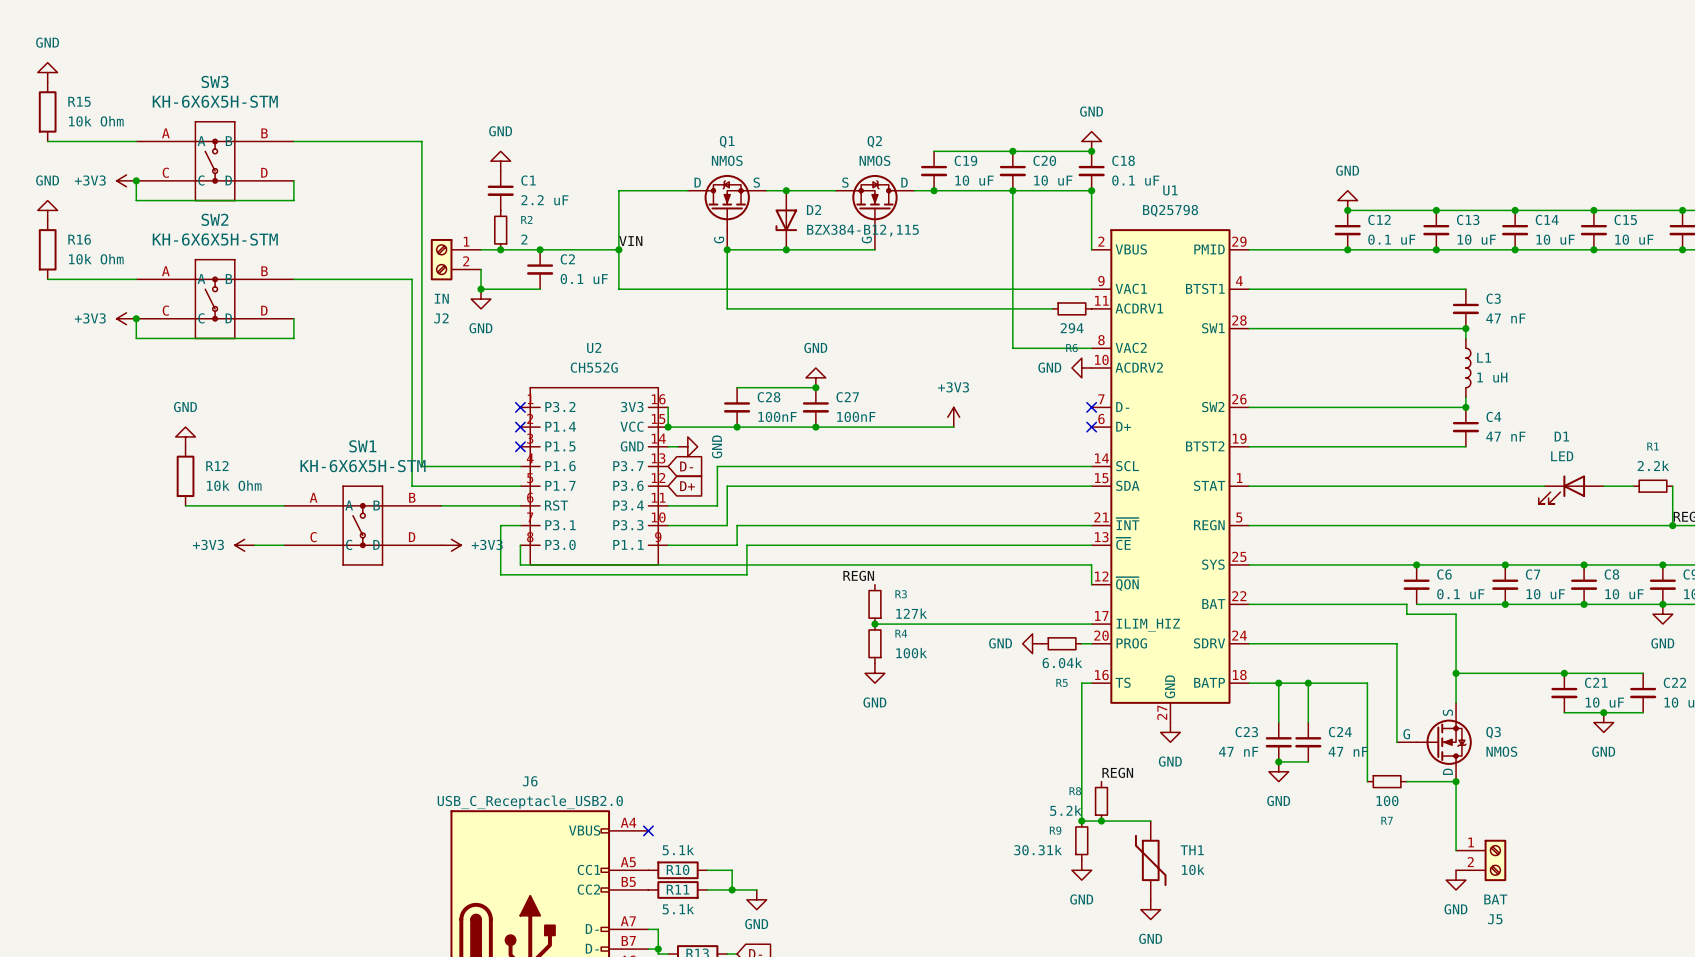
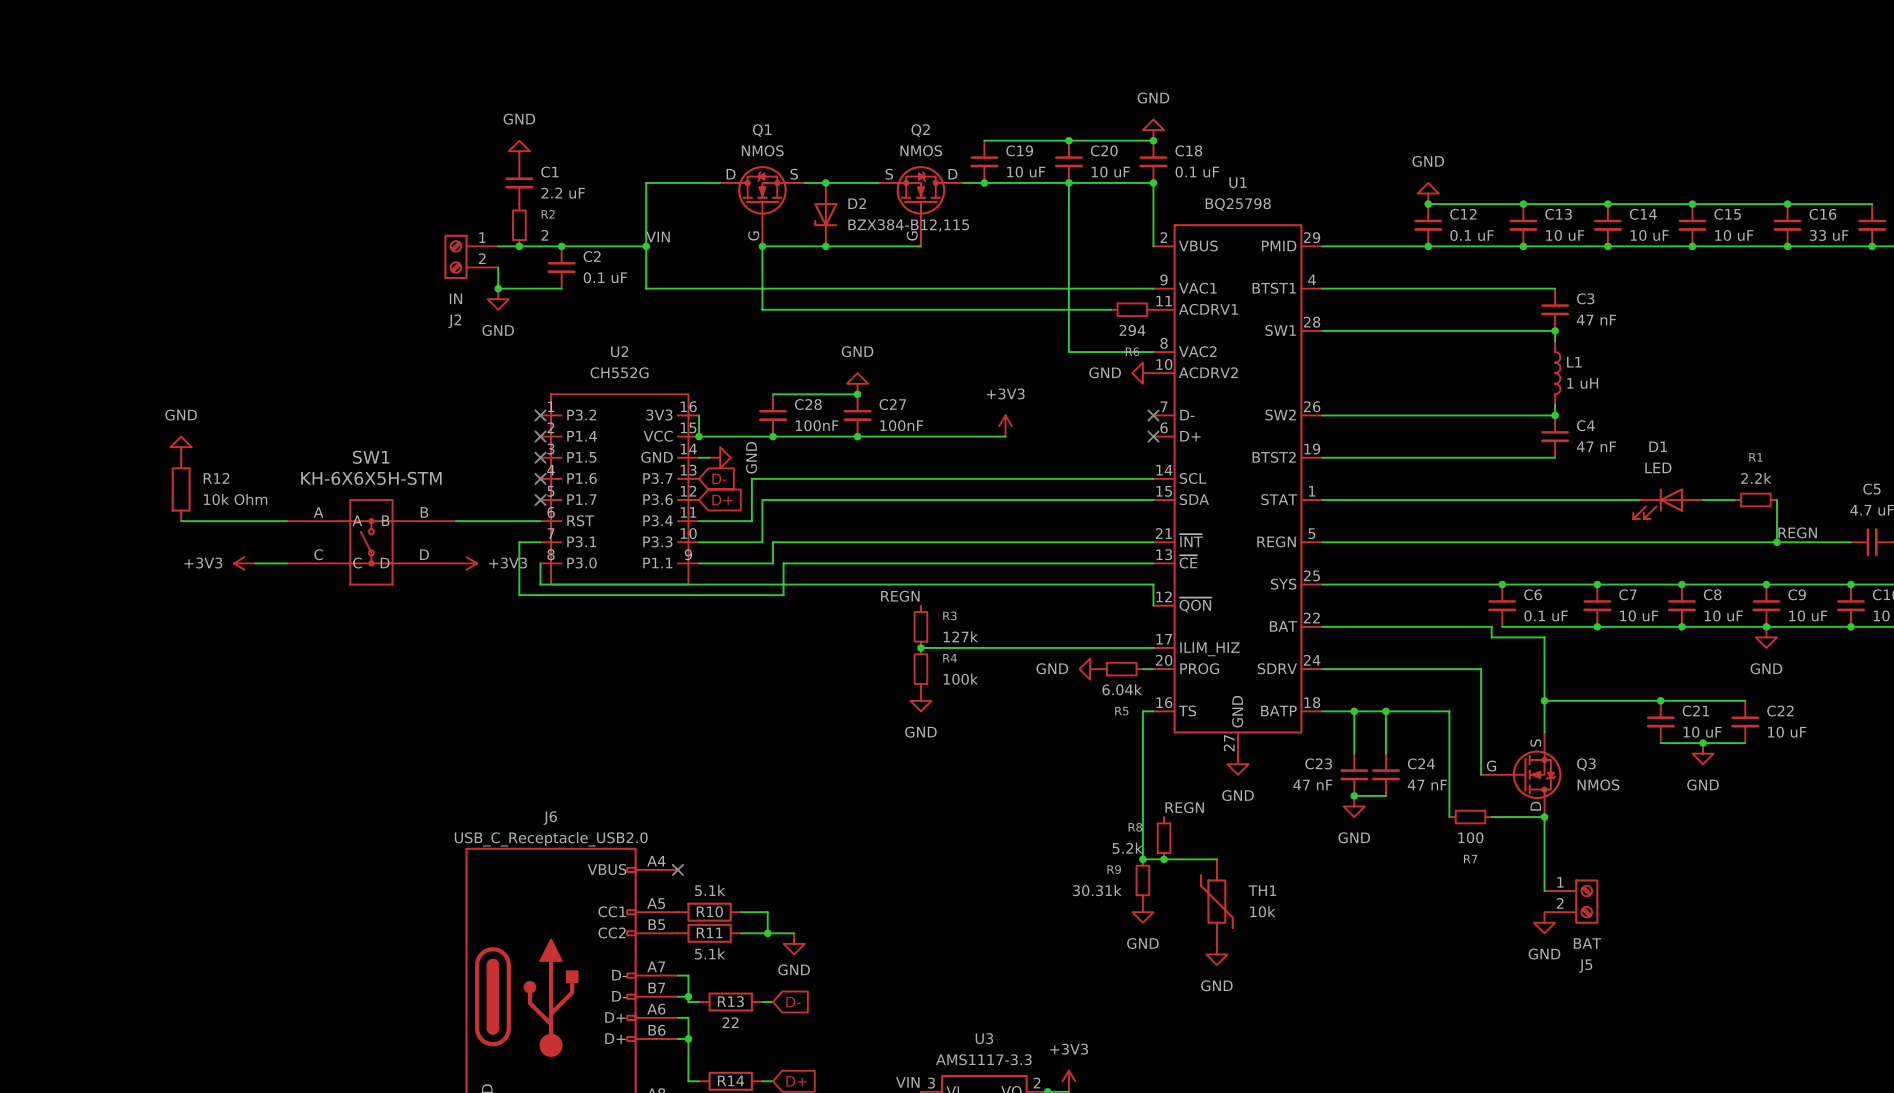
power symbol: GND (47, 72) -> none
R15: 10k Ohm (47, 111) -> none
wire: (47, 141) (136, 141) -> none
wire: (293, 141) (421, 141) (421, 466) (520, 466) -> none
SW3: KH-6X6X5H-STM (215, 161) -> none
power symbol: +3V3 (126, 180) -> none
wire: (136, 180) (136, 200) (293, 200) (293, 180) -> none
junction: (136, 180) -> none
power symbol: GND (47, 210) -> none
R16: 10k Ohm (47, 249) -> none
wire: (47, 279) (136, 279) -> none
wire: (293, 279) (412, 279) (412, 486) (520, 486) -> none
SW2: KH-6X6X5H-STM (215, 299) -> none
power symbol: +3V3 (126, 318) -> none
wire: (136, 318) (136, 338) (293, 338) (293, 318) -> none
junction: (136, 318) -> none
no-connect mark: none -> (540, 478)
no-connect mark: none -> (540, 500)

